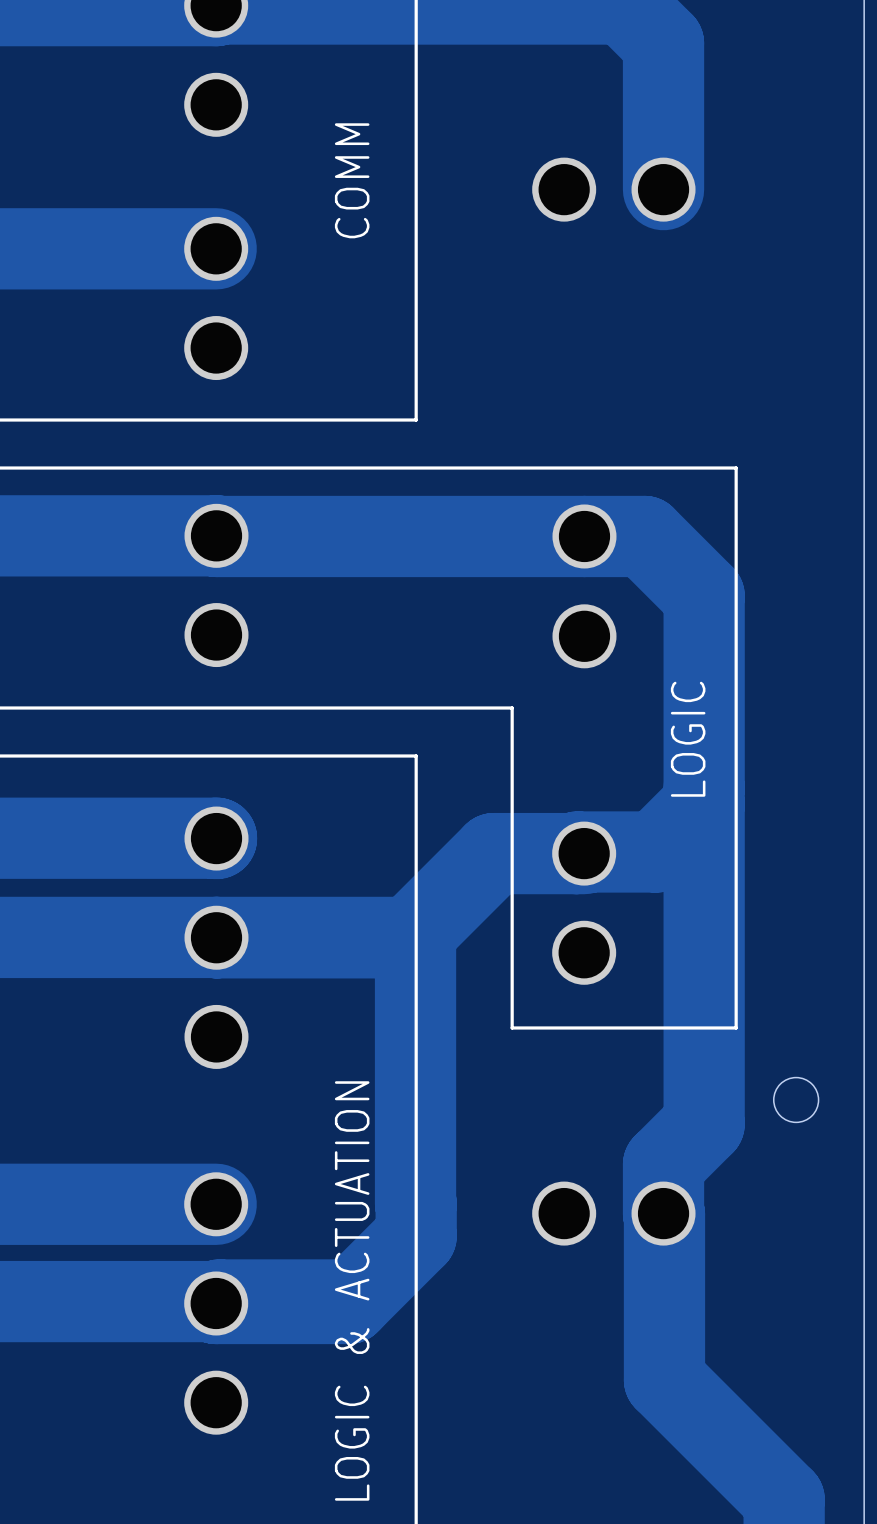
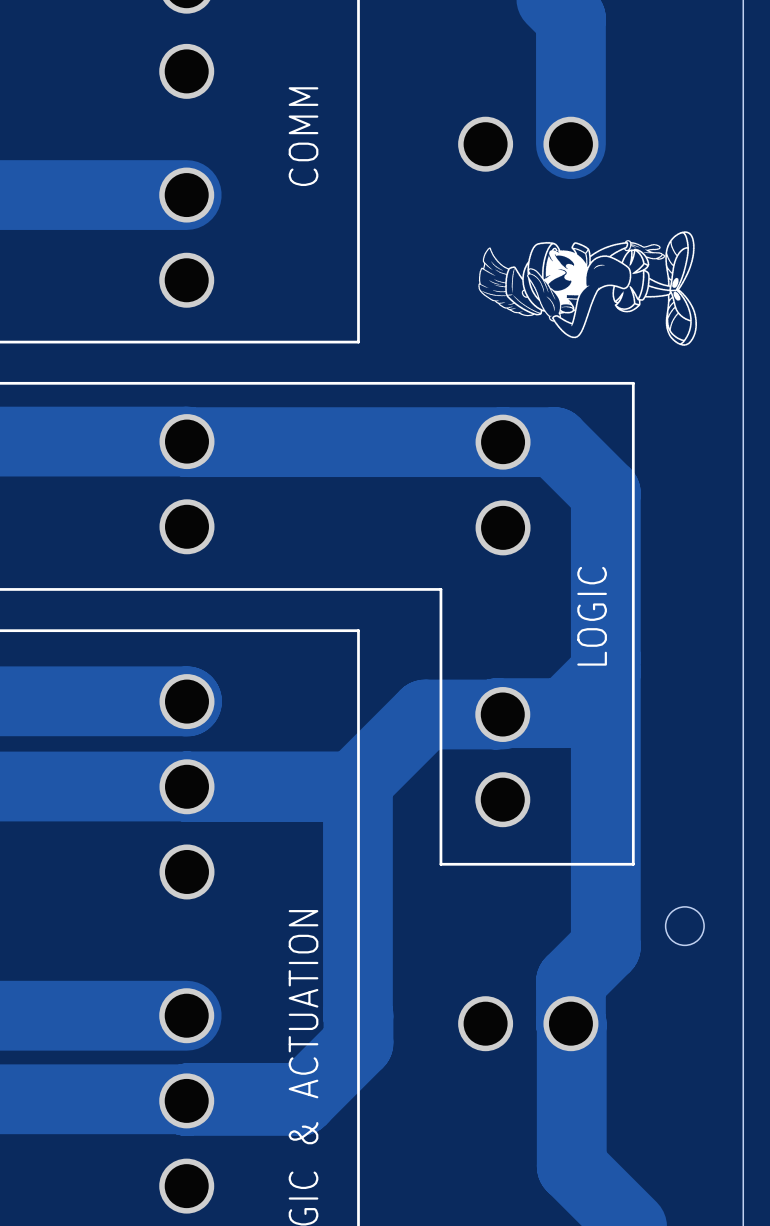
drawing: none -> [478, 231, 697, 346]

